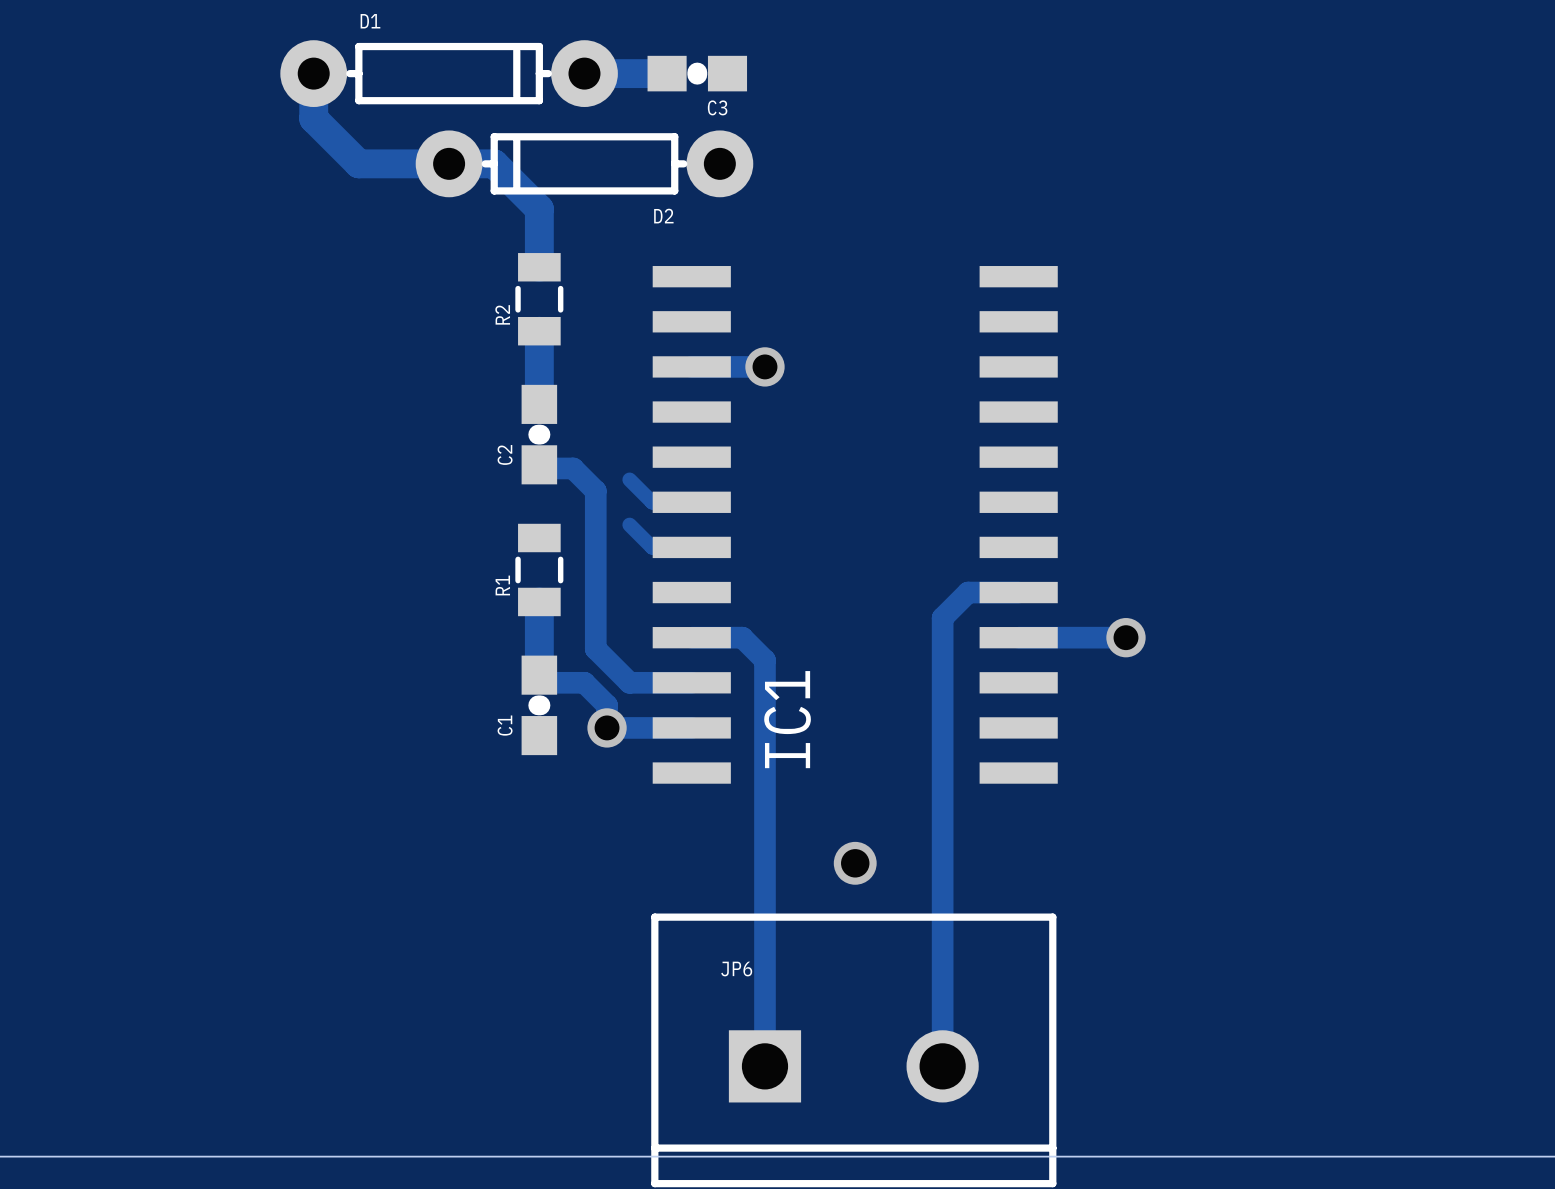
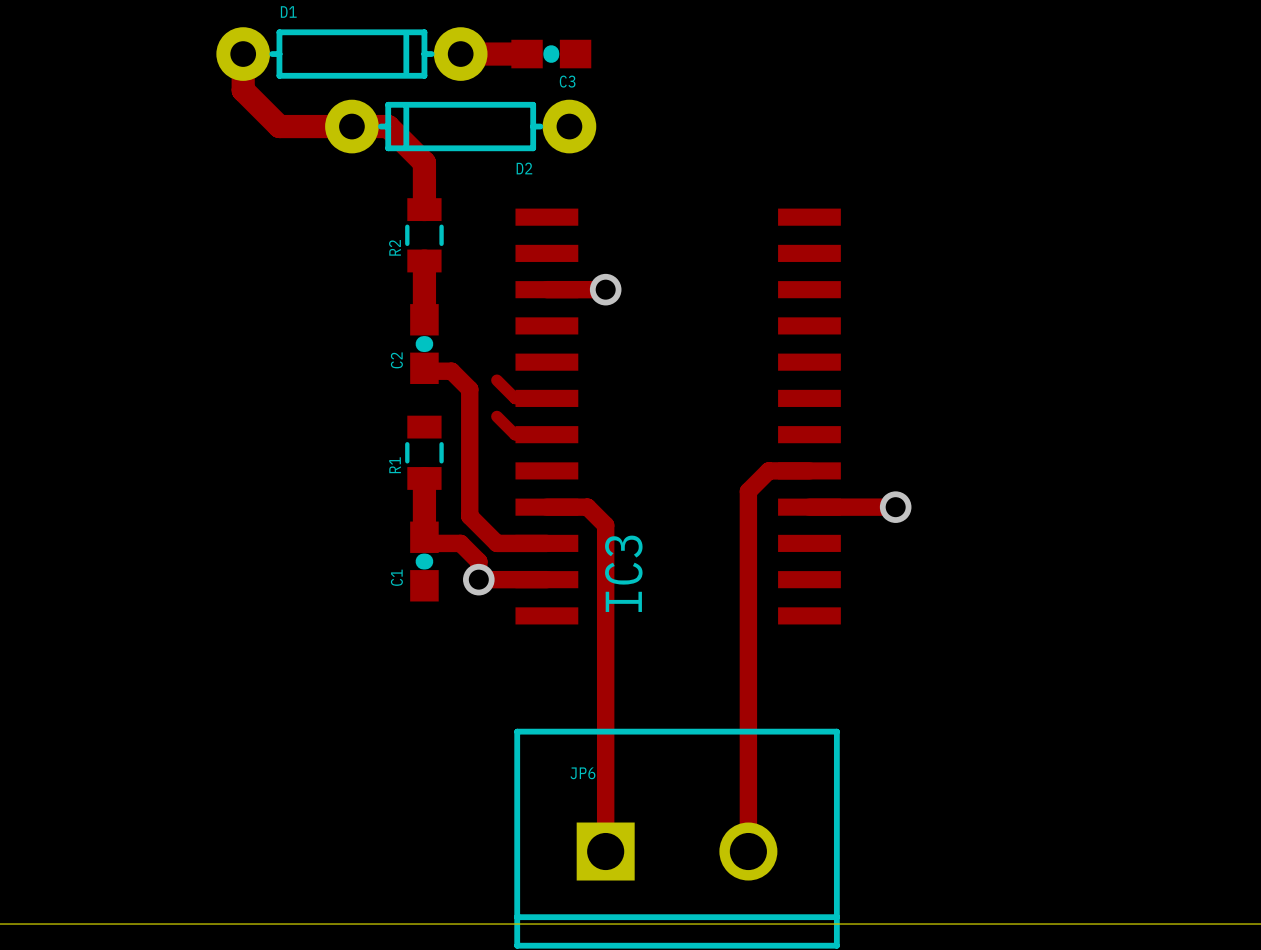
IC1 name: IC1 (787, 719) -> IC3 (623, 573)
via: (855, 863) -> none

